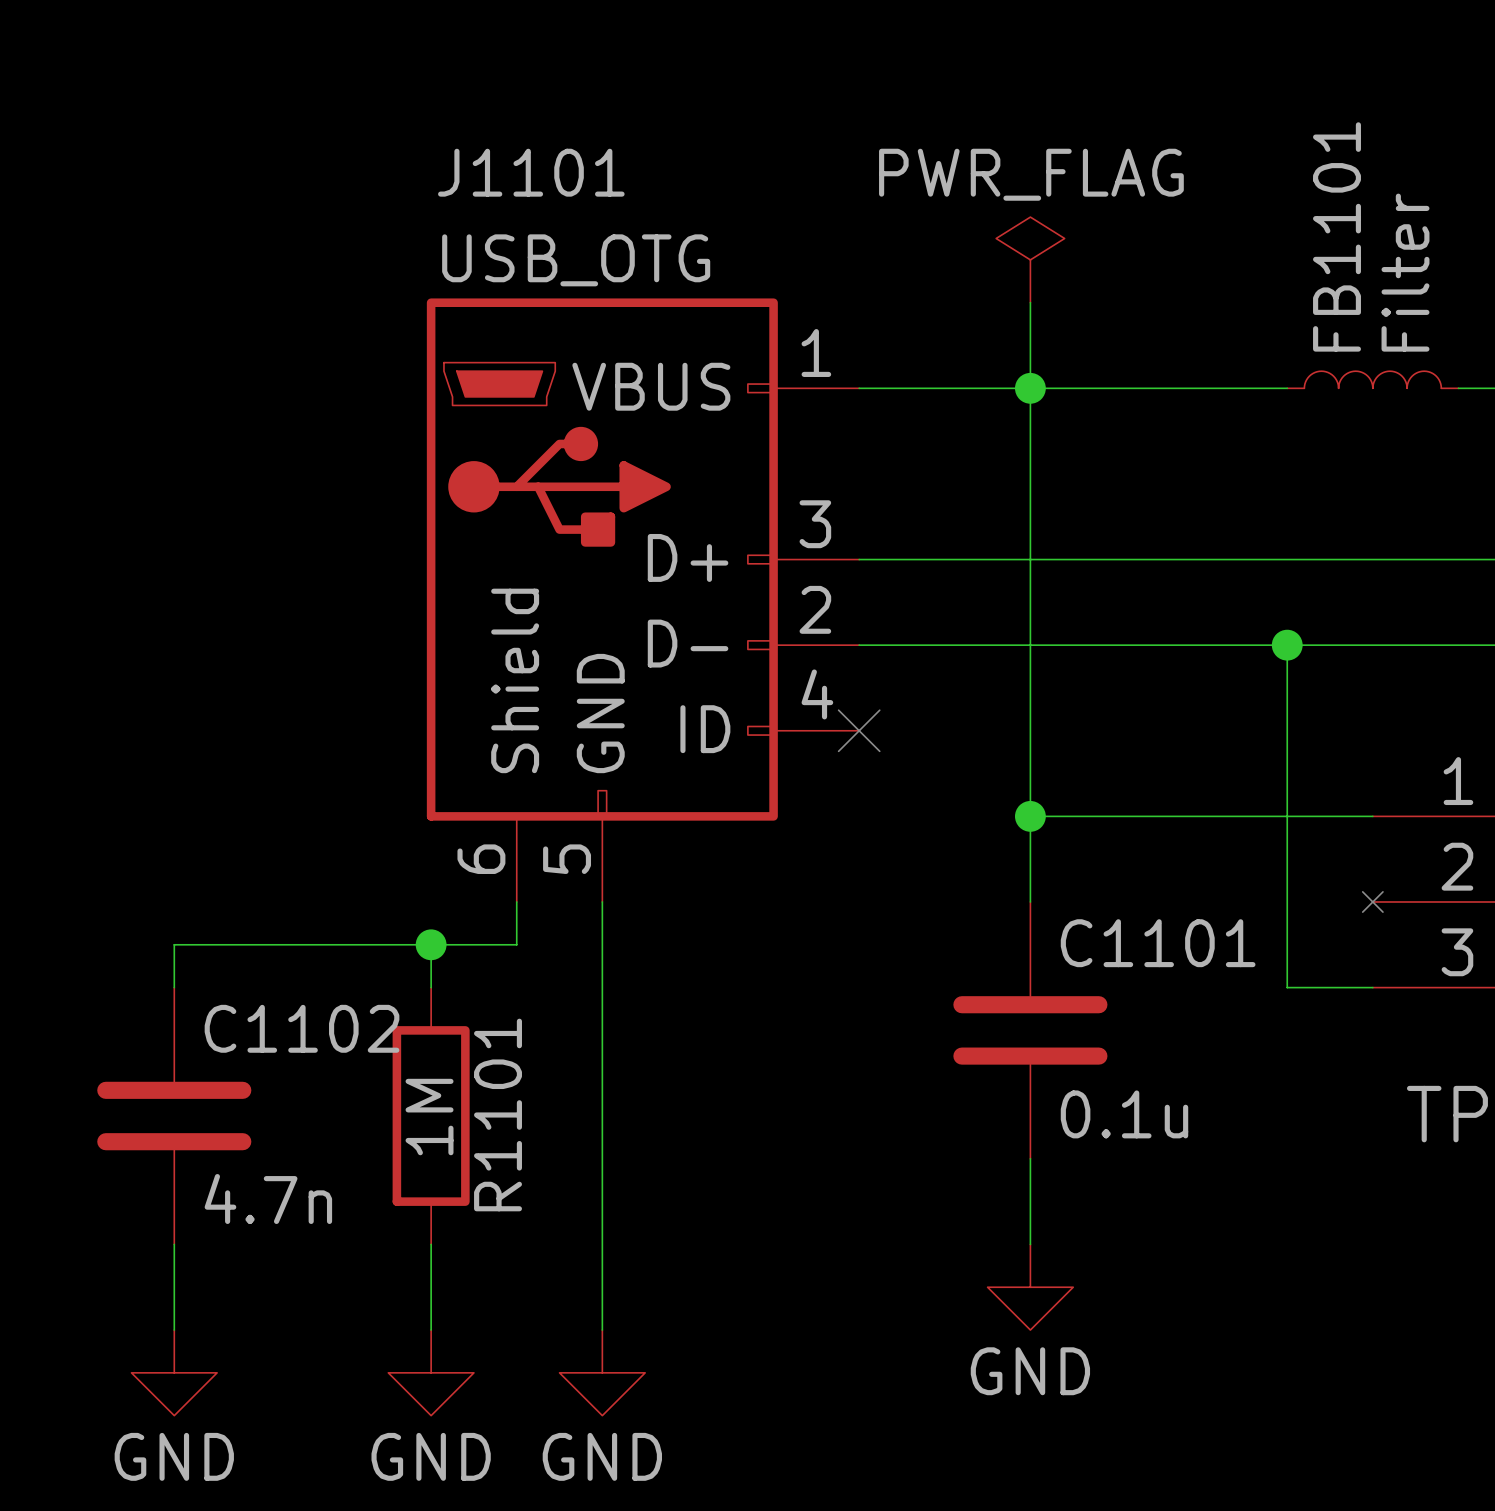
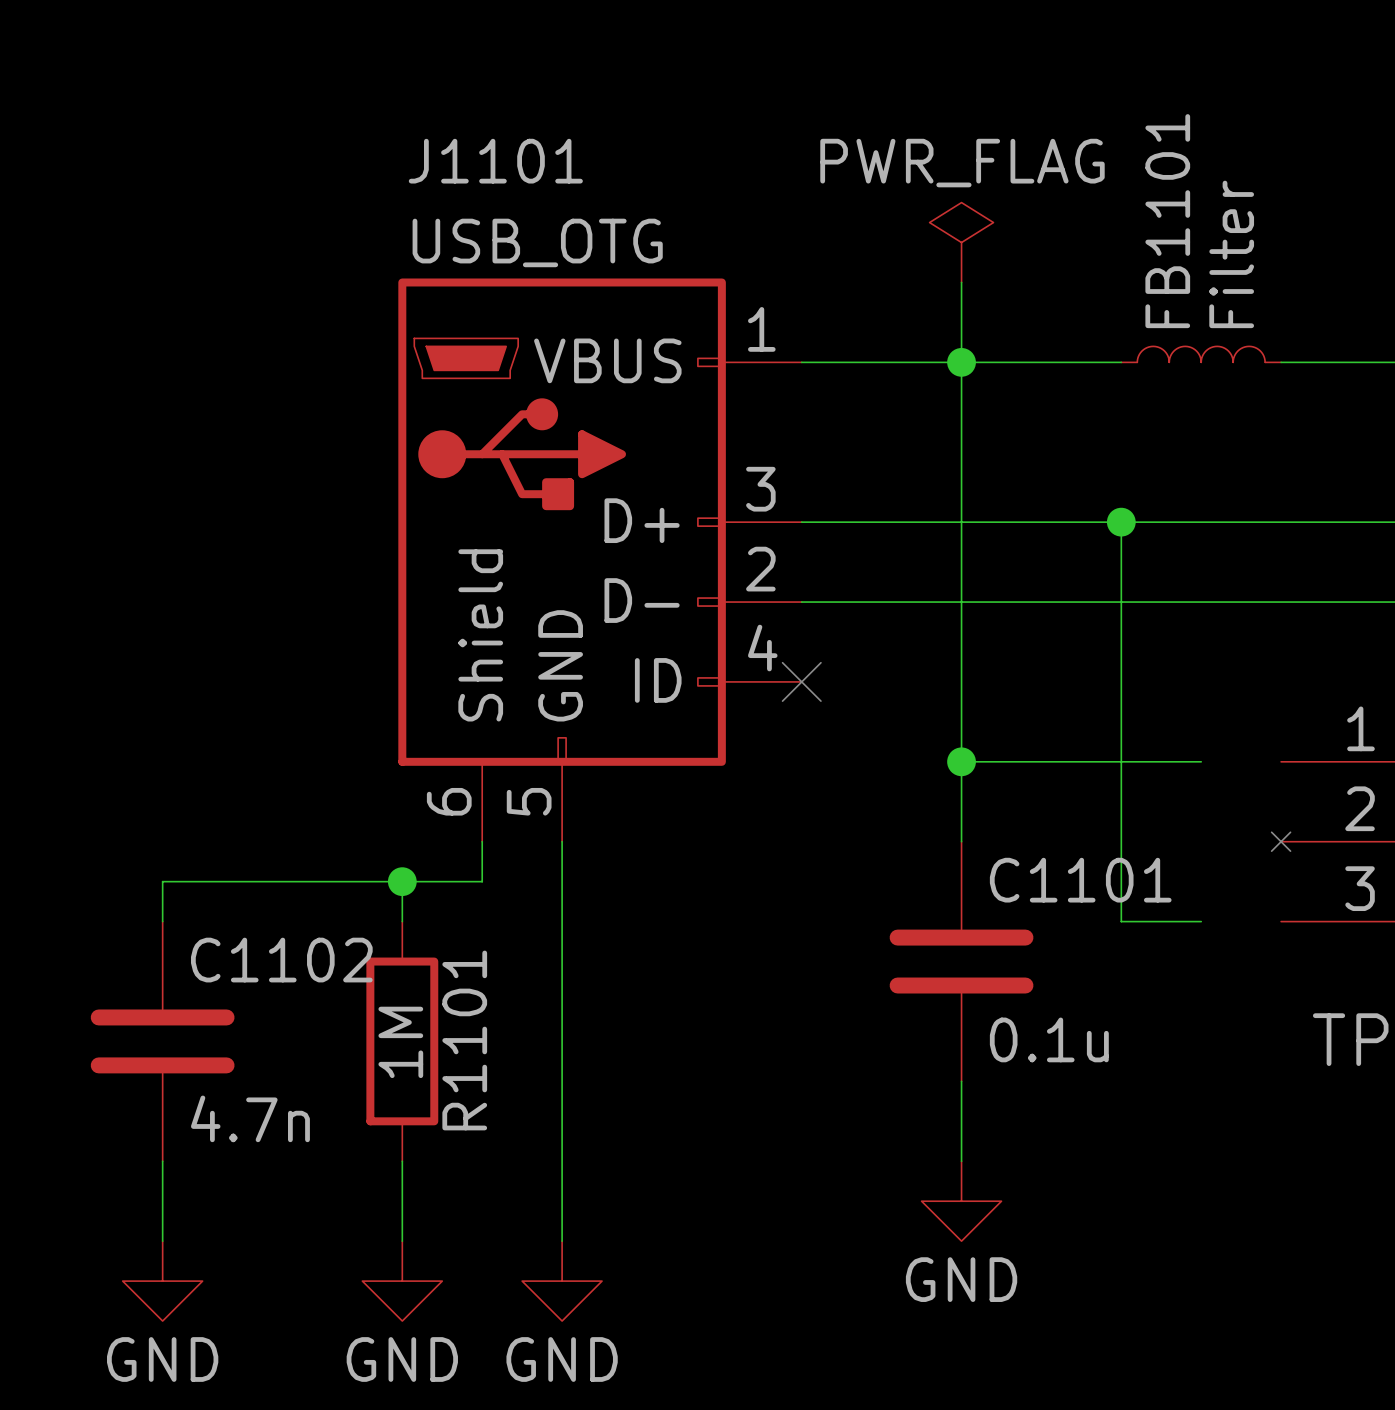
FB1101 position: (1372, 379) -> (1201, 354)
wire: (1201, 388) (1287, 388) -> (1281, 362) (1360, 362)
wire: none -> (1121, 522) (1121, 921) (1201, 921)
wire: (1287, 645) (1287, 987) (1372, 987) -> none
junction position: (1287, 645) -> (1121, 522)
wire: (1287, 816) (1372, 816) -> none

